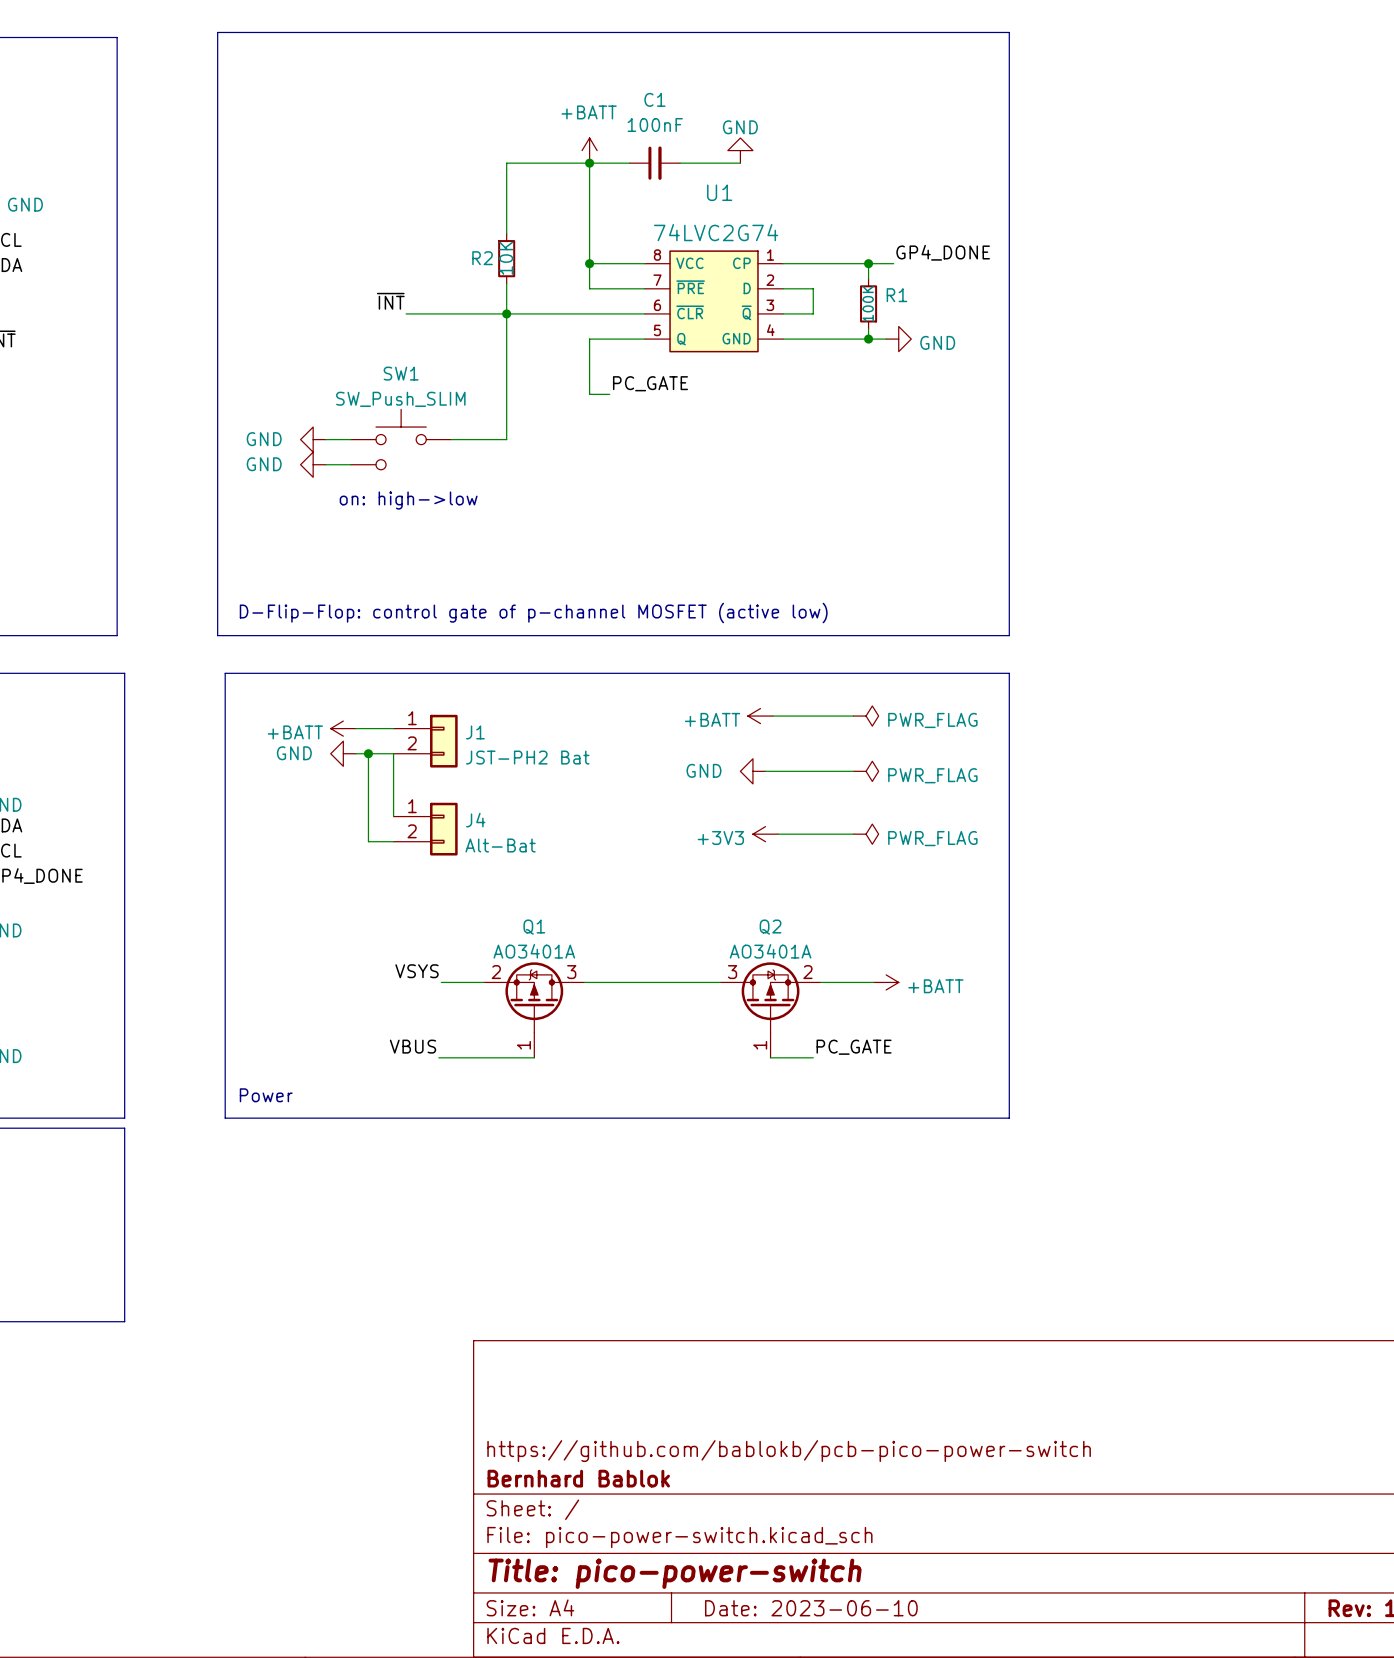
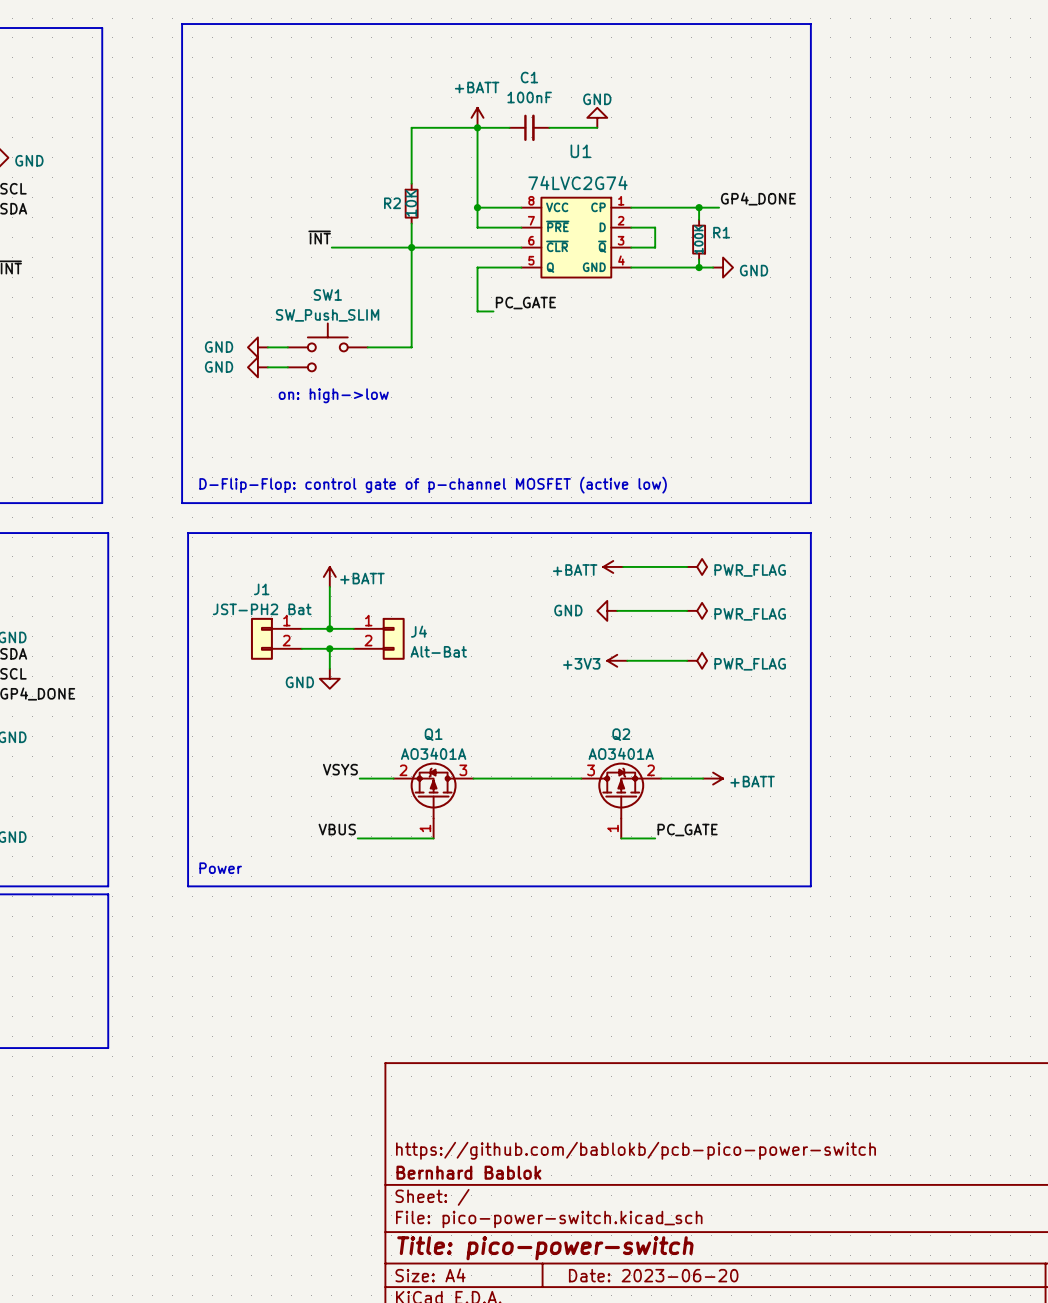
power symbol rotation: 0° (343, 728) -> 90° clockwise (329, 576)
power symbol position: +BATT (343, 728) -> +BATT (329, 576)
wire: (355, 728) (393, 728) -> none
power symbol text position: +BATT (295, 732) -> +BATT (362, 578)
J1 name position: J1 (475, 732) -> J1 (261, 589)
wire: none -> (329, 586) (329, 628)
J1 position: (425, 741) -> (276, 638)
J1 flip: as is (443, 741) -> left-right (261, 638)
power symbol rotation: 0° (343, 753) -> 90° counterclockwise (329, 678)
power symbol position: GND (343, 753) -> GND (329, 678)
wire: (355, 753) (393, 753) (393, 816) -> none
wire: (368, 753) (368, 841) (393, 841) -> none
junction: (368, 753) -> none
J1 value position: JST-PH2 Bat (527, 757) -> JST-PH2 Bat (262, 609)
wire: none -> (301, 628) (353, 628)
junction: none -> (329, 628)
wire: none -> (301, 648) (353, 648)
wire: none -> (329, 648) (329, 668)
junction: none -> (329, 648)
J4 position: (425, 829) -> (379, 638)
title block: Date: 2023-06-10 (811, 1608) -> Date: 2023-06-20 (653, 1275)

